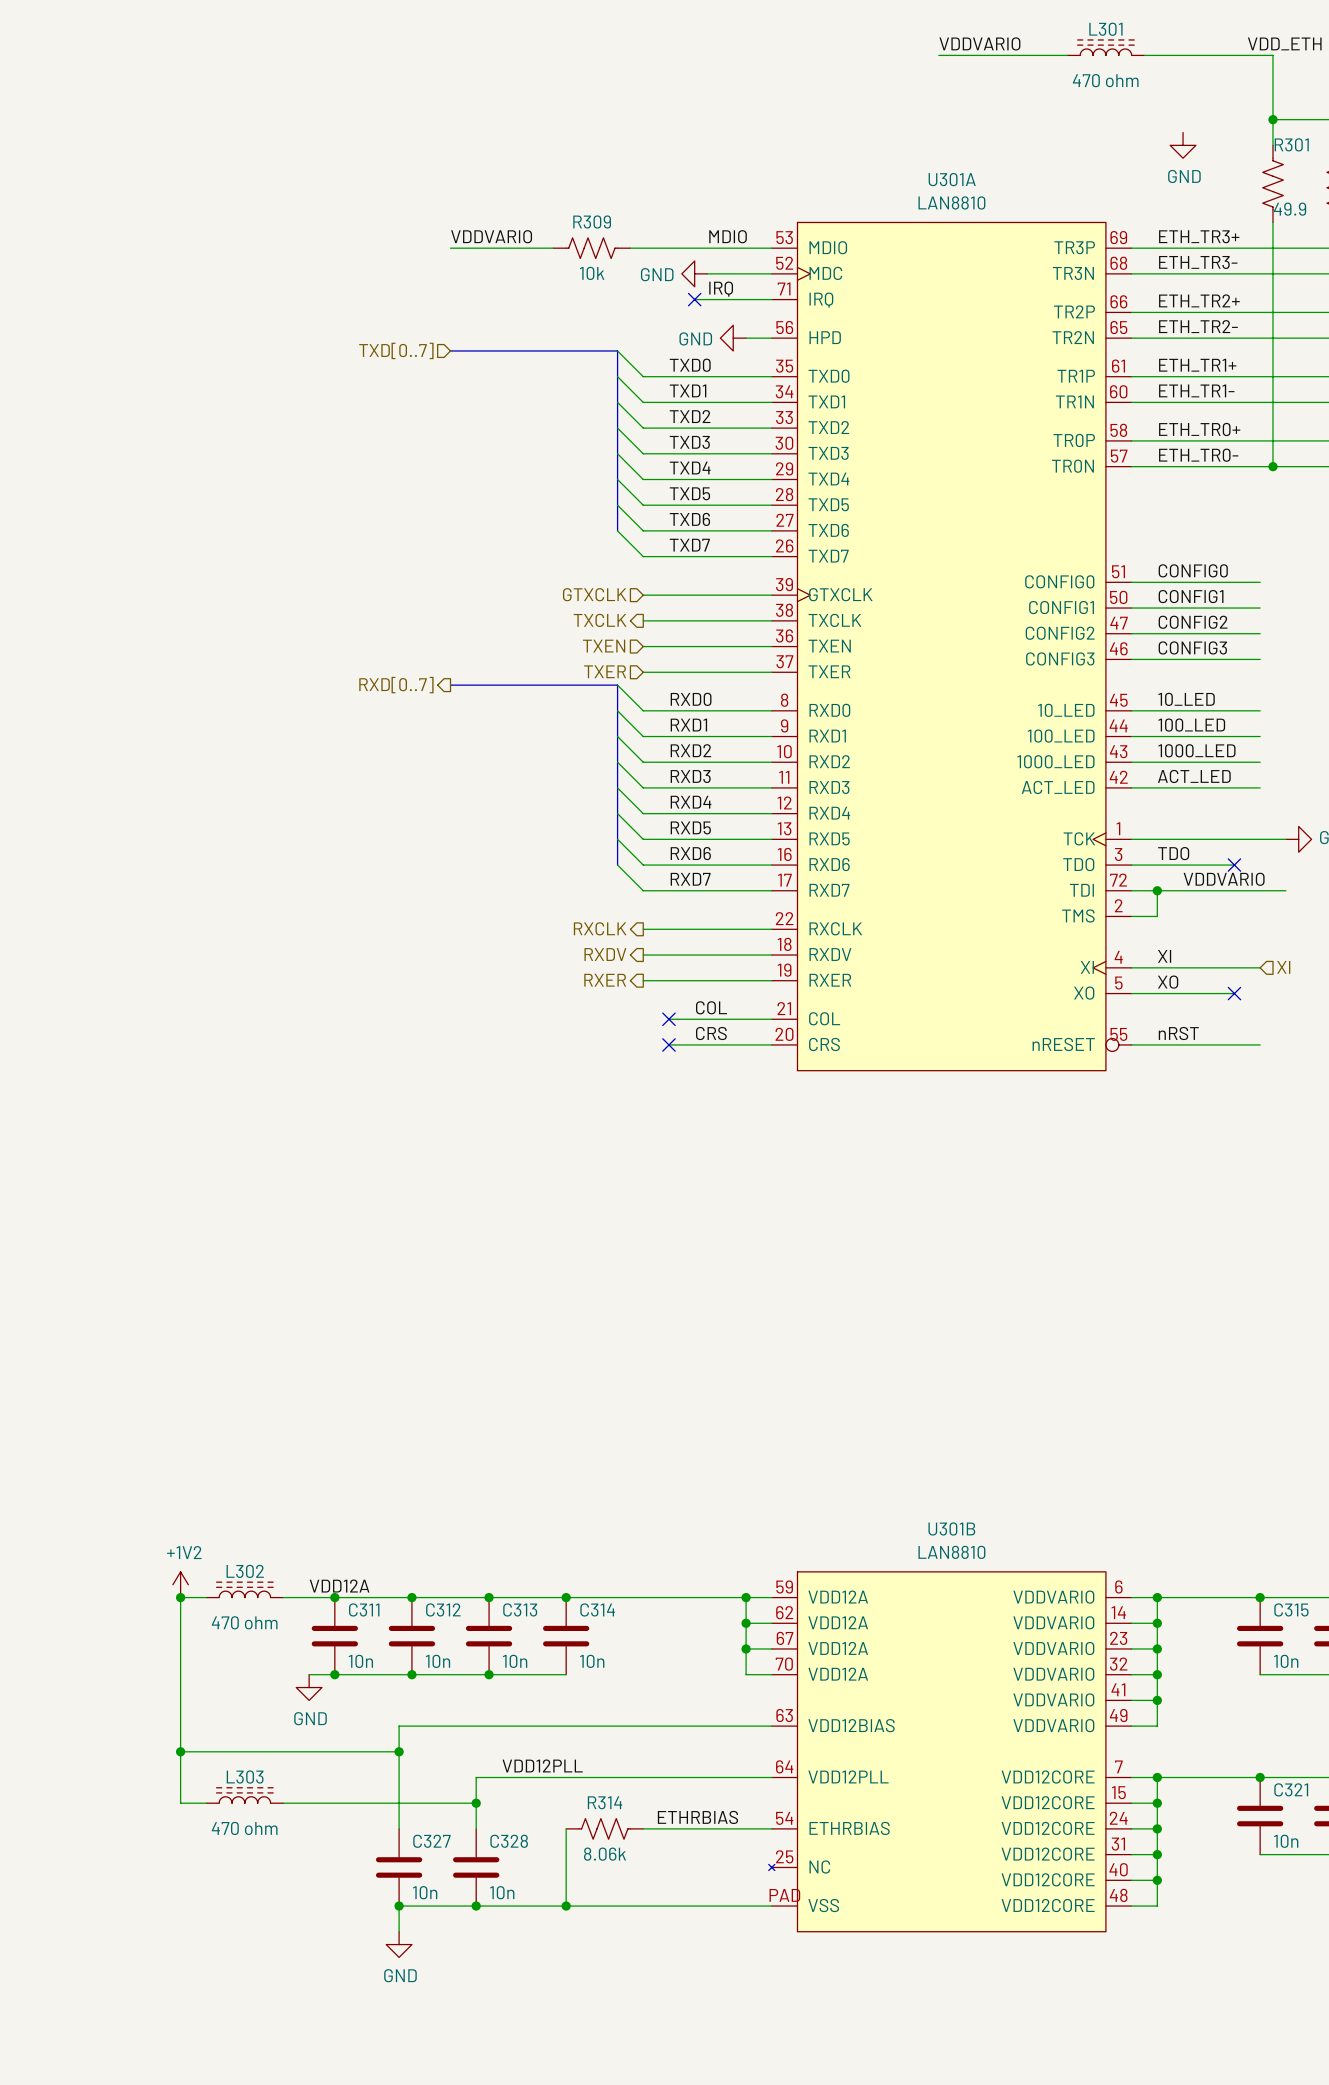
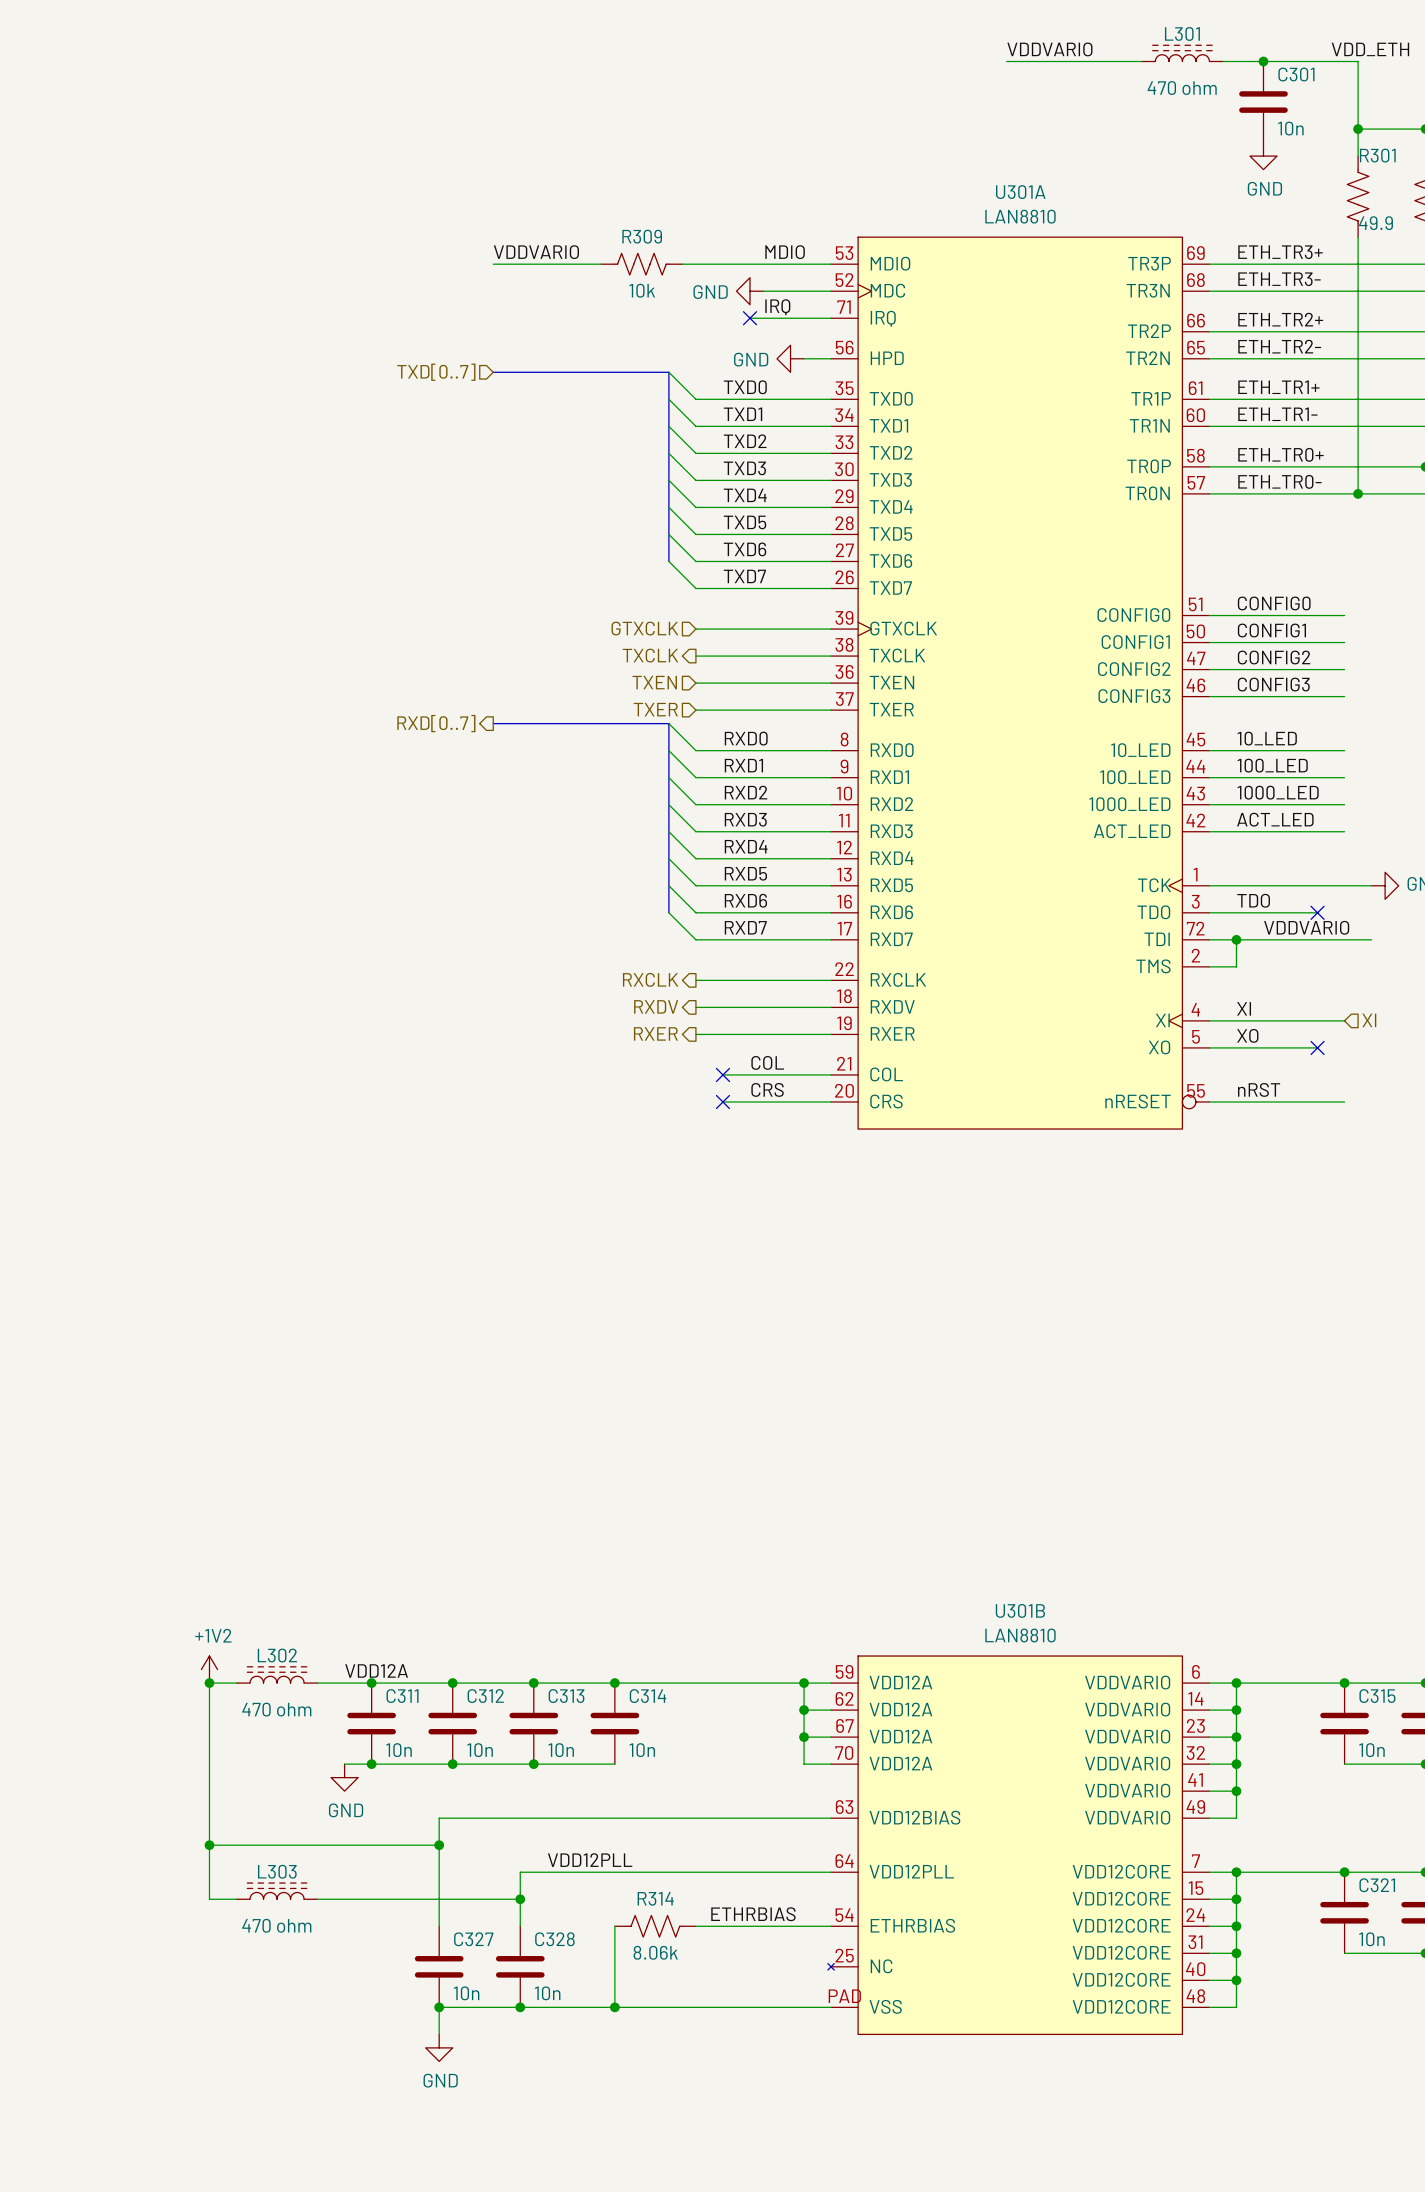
junction: none -> (1263, 61)
C301: none -> 10n (1263, 102)

